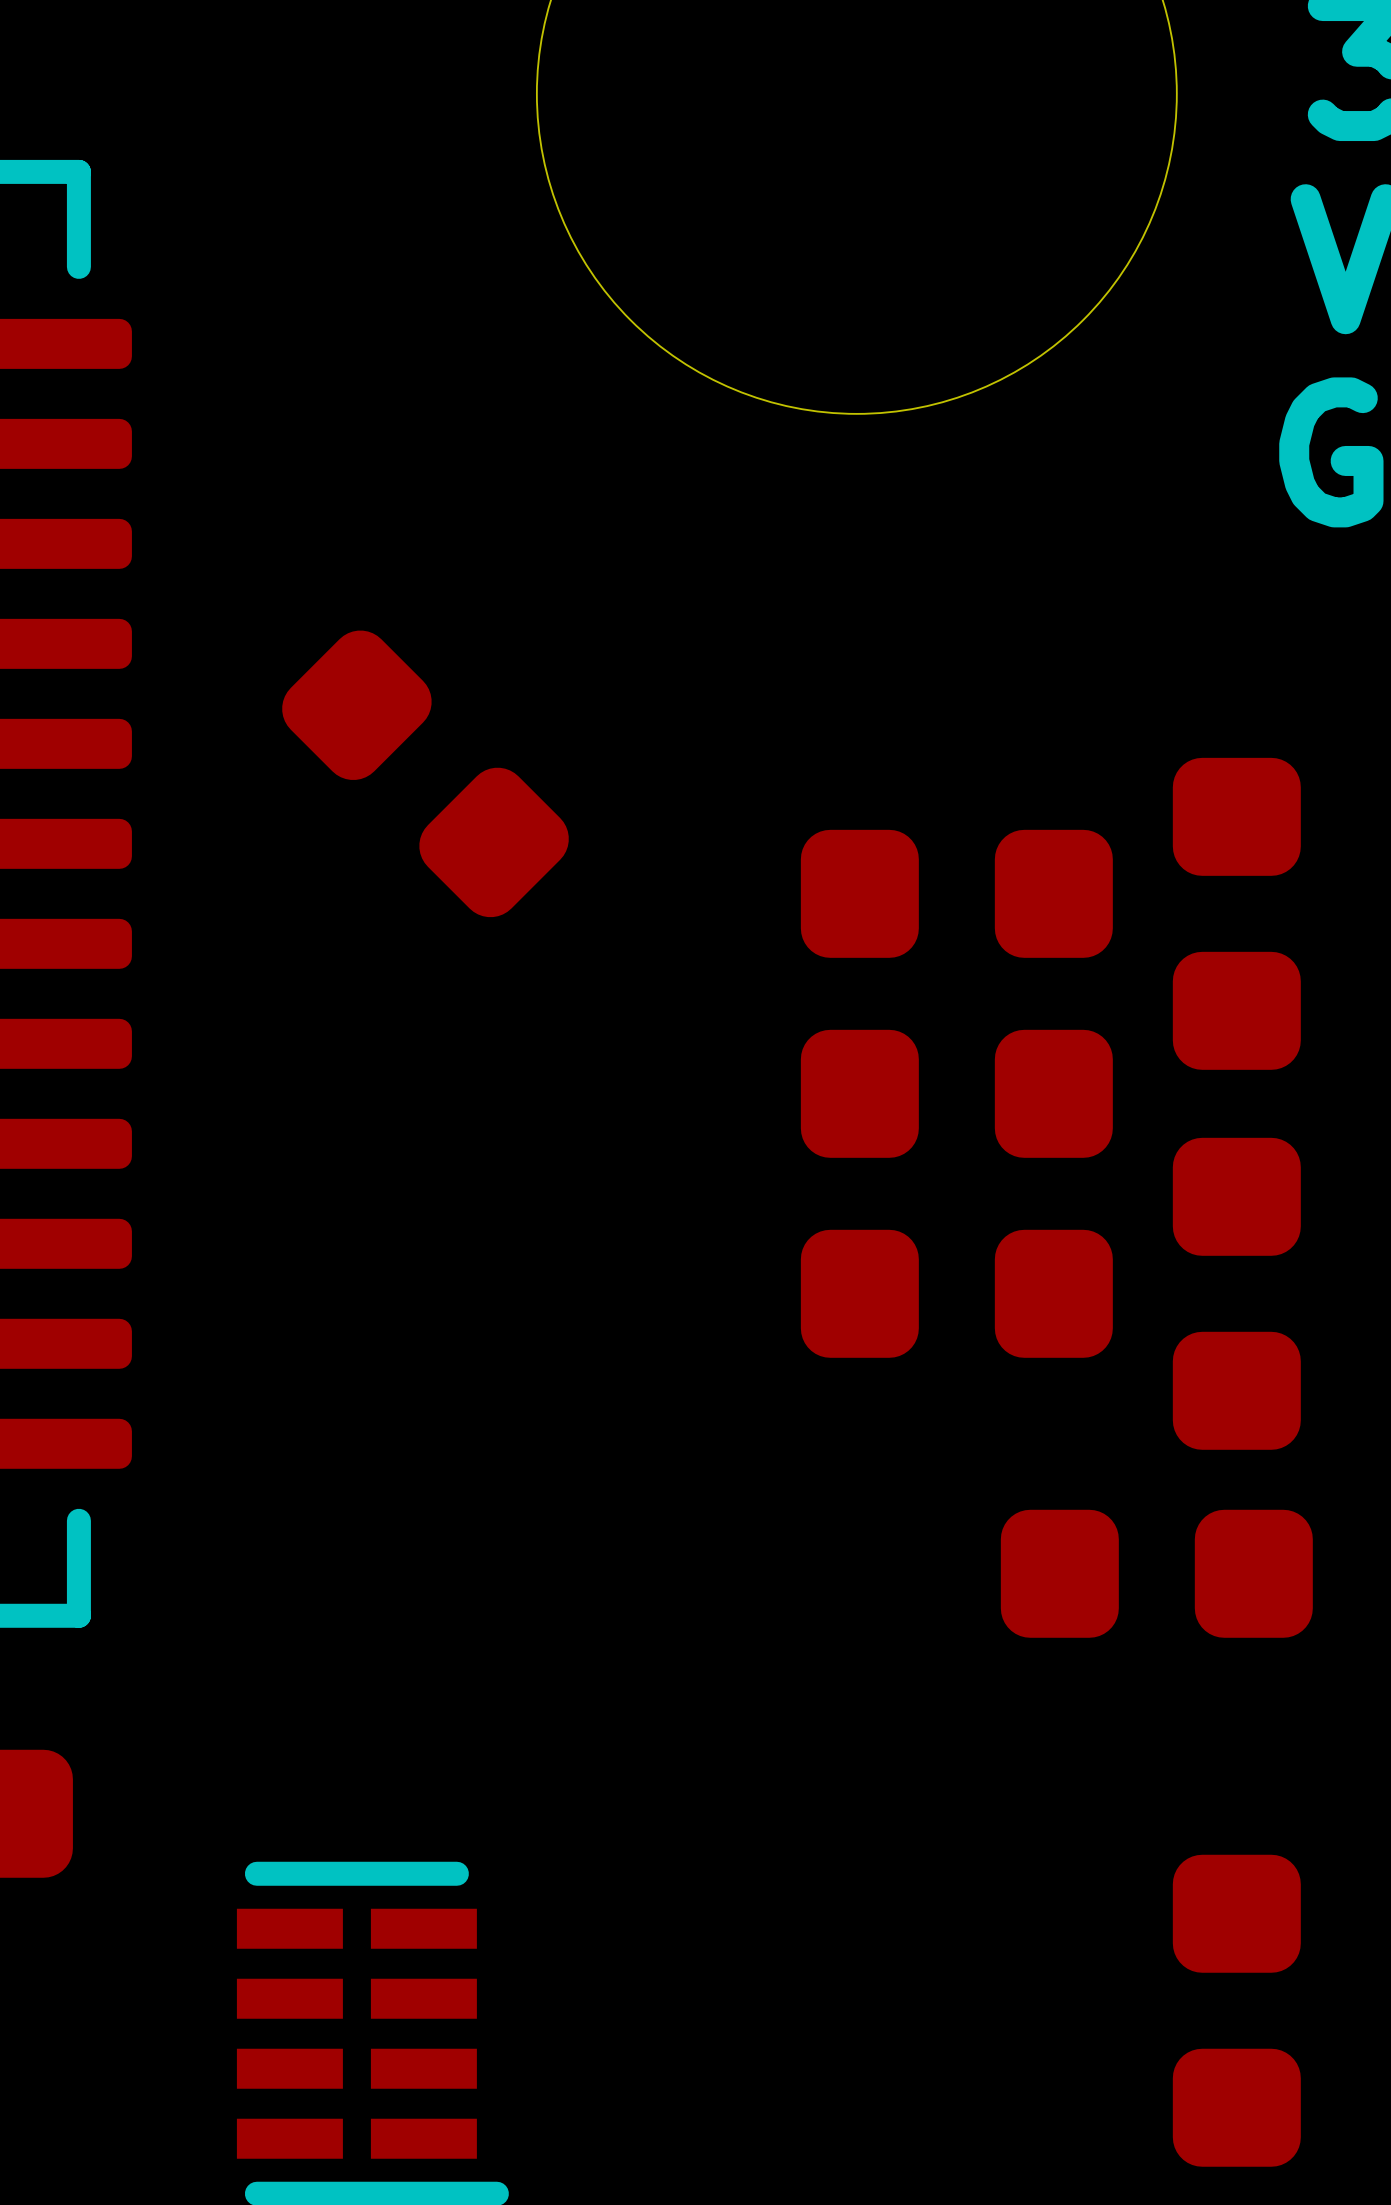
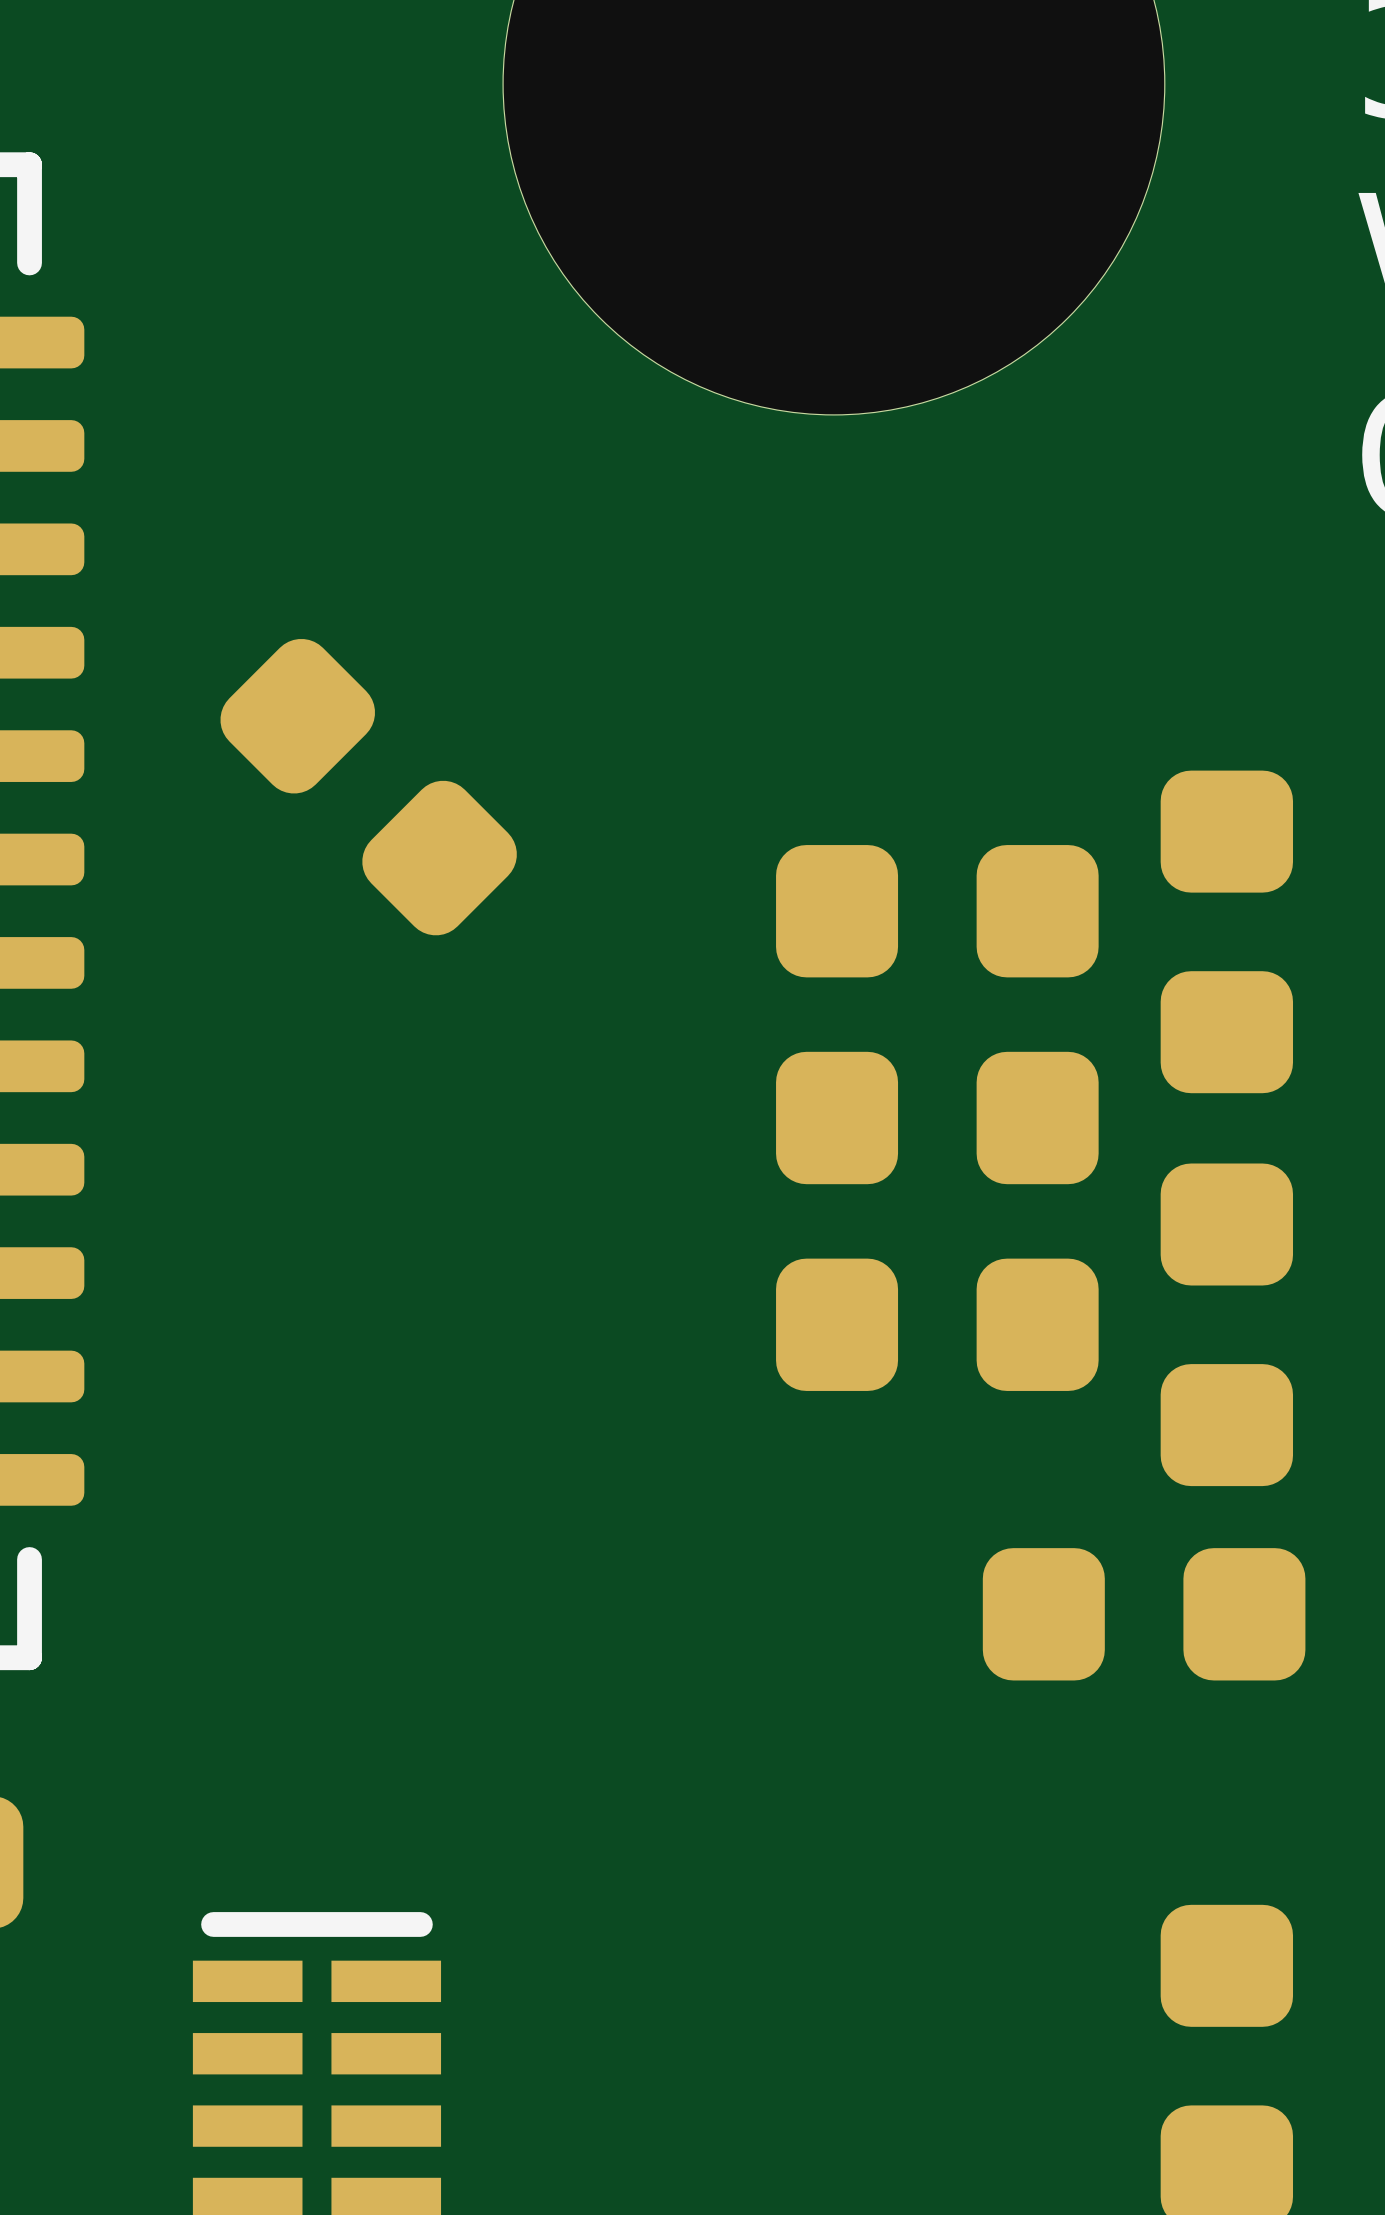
part position: (425, 773) -> (368, 787)

